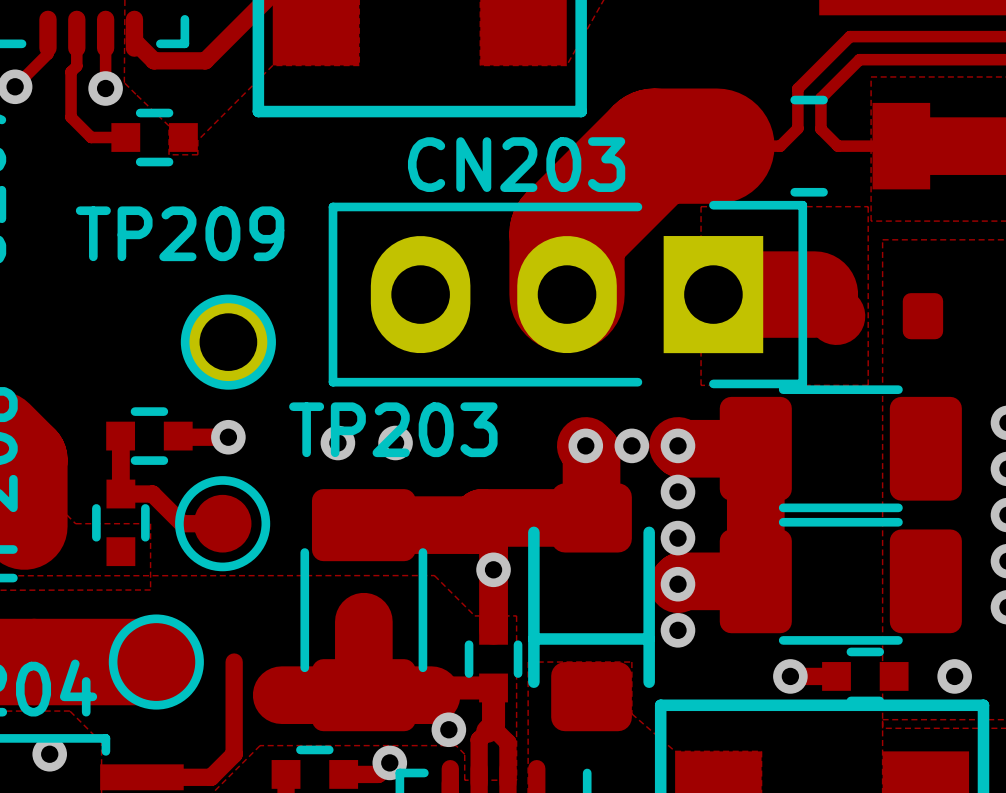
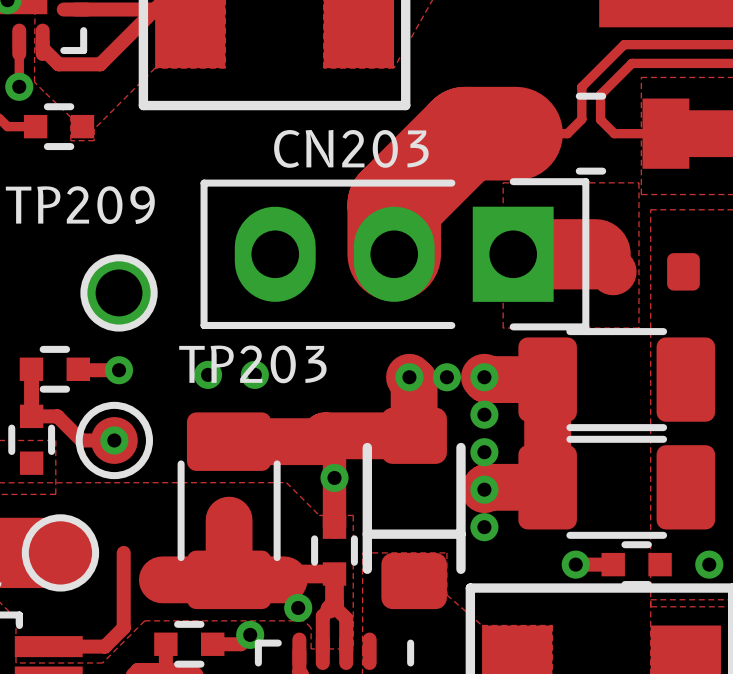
via: none -> (114, 440)

